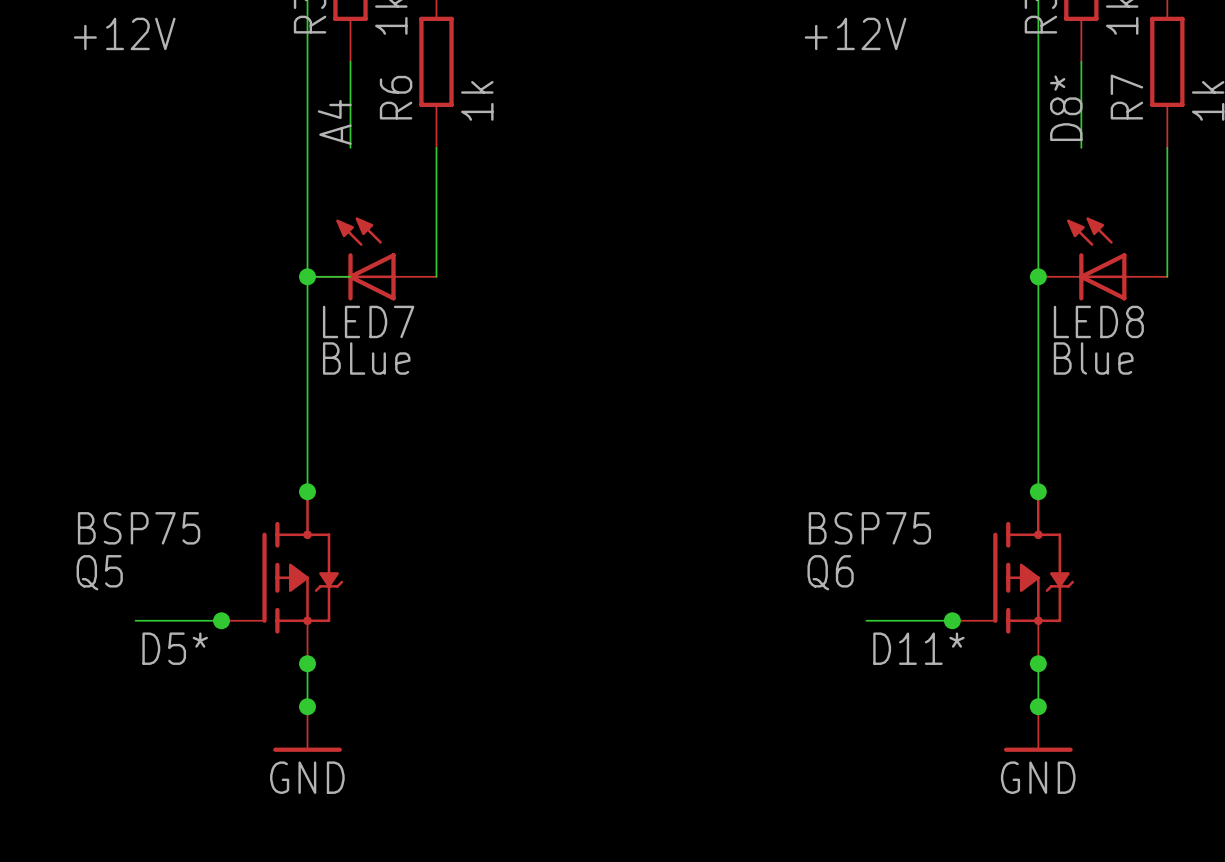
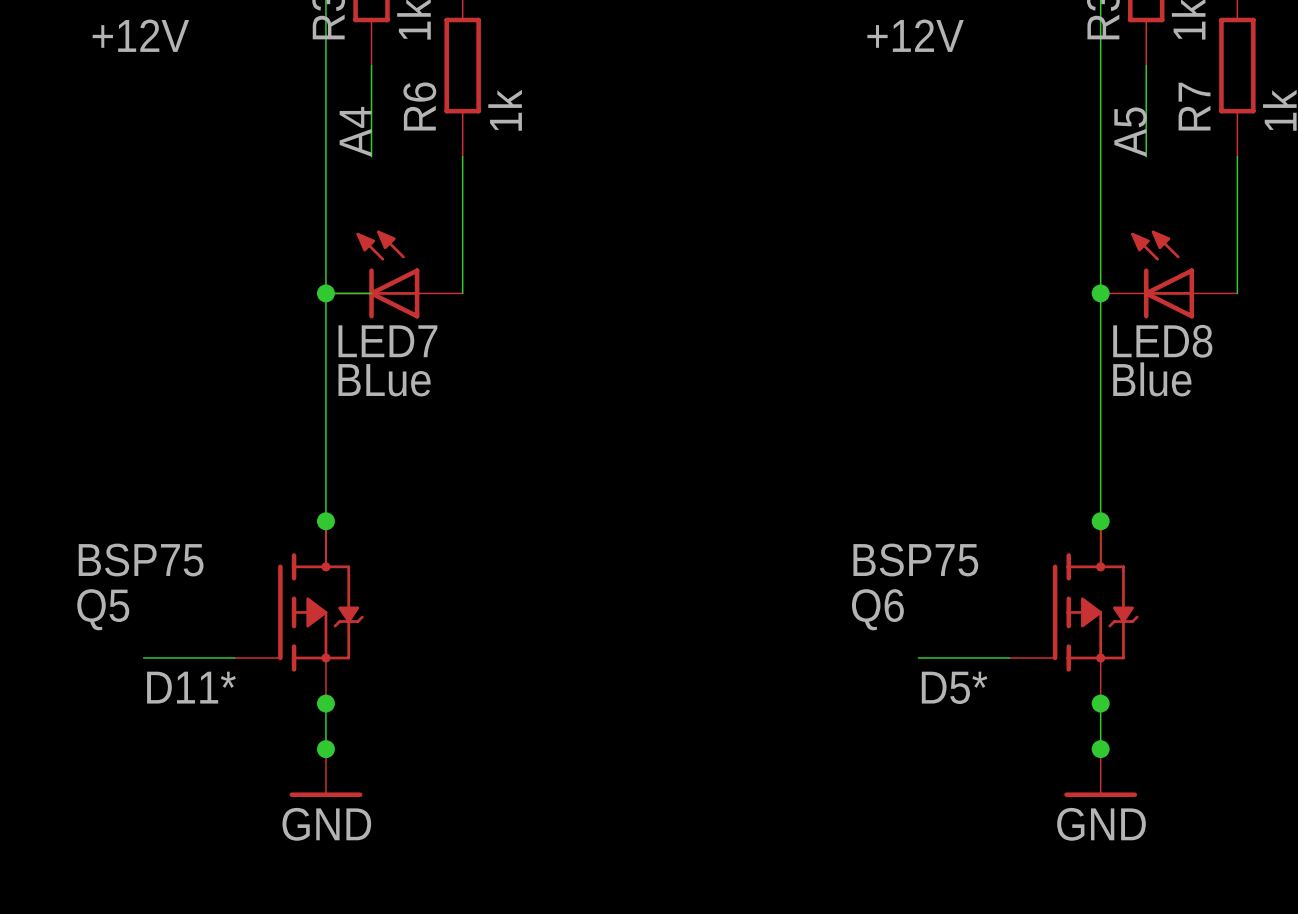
label: D8* (1066, 108) -> A5 (1130, 132)
junction: (221, 620) -> none
junction: (952, 620) -> none
label: D5* (175, 648) -> D11* (191, 687)
label: D11* (918, 648) -> D5* (954, 687)

